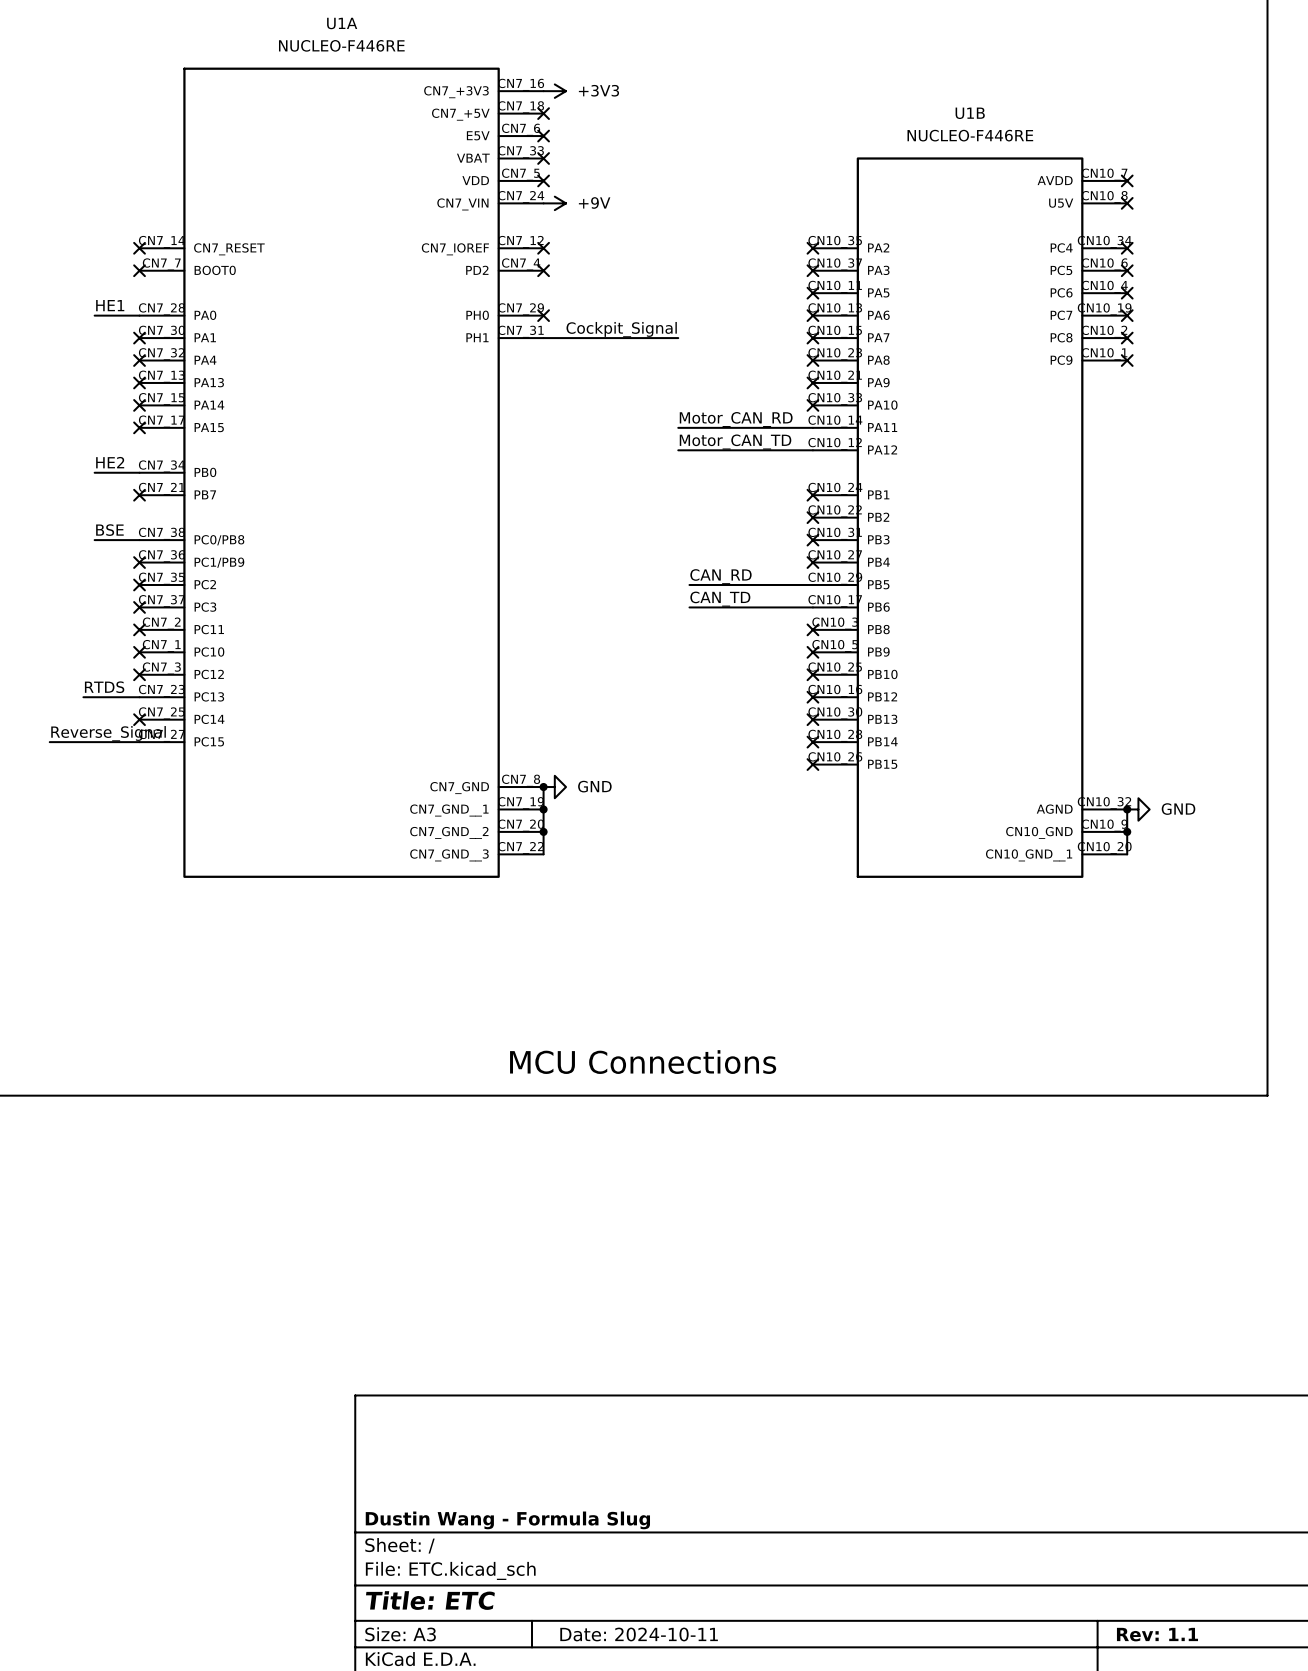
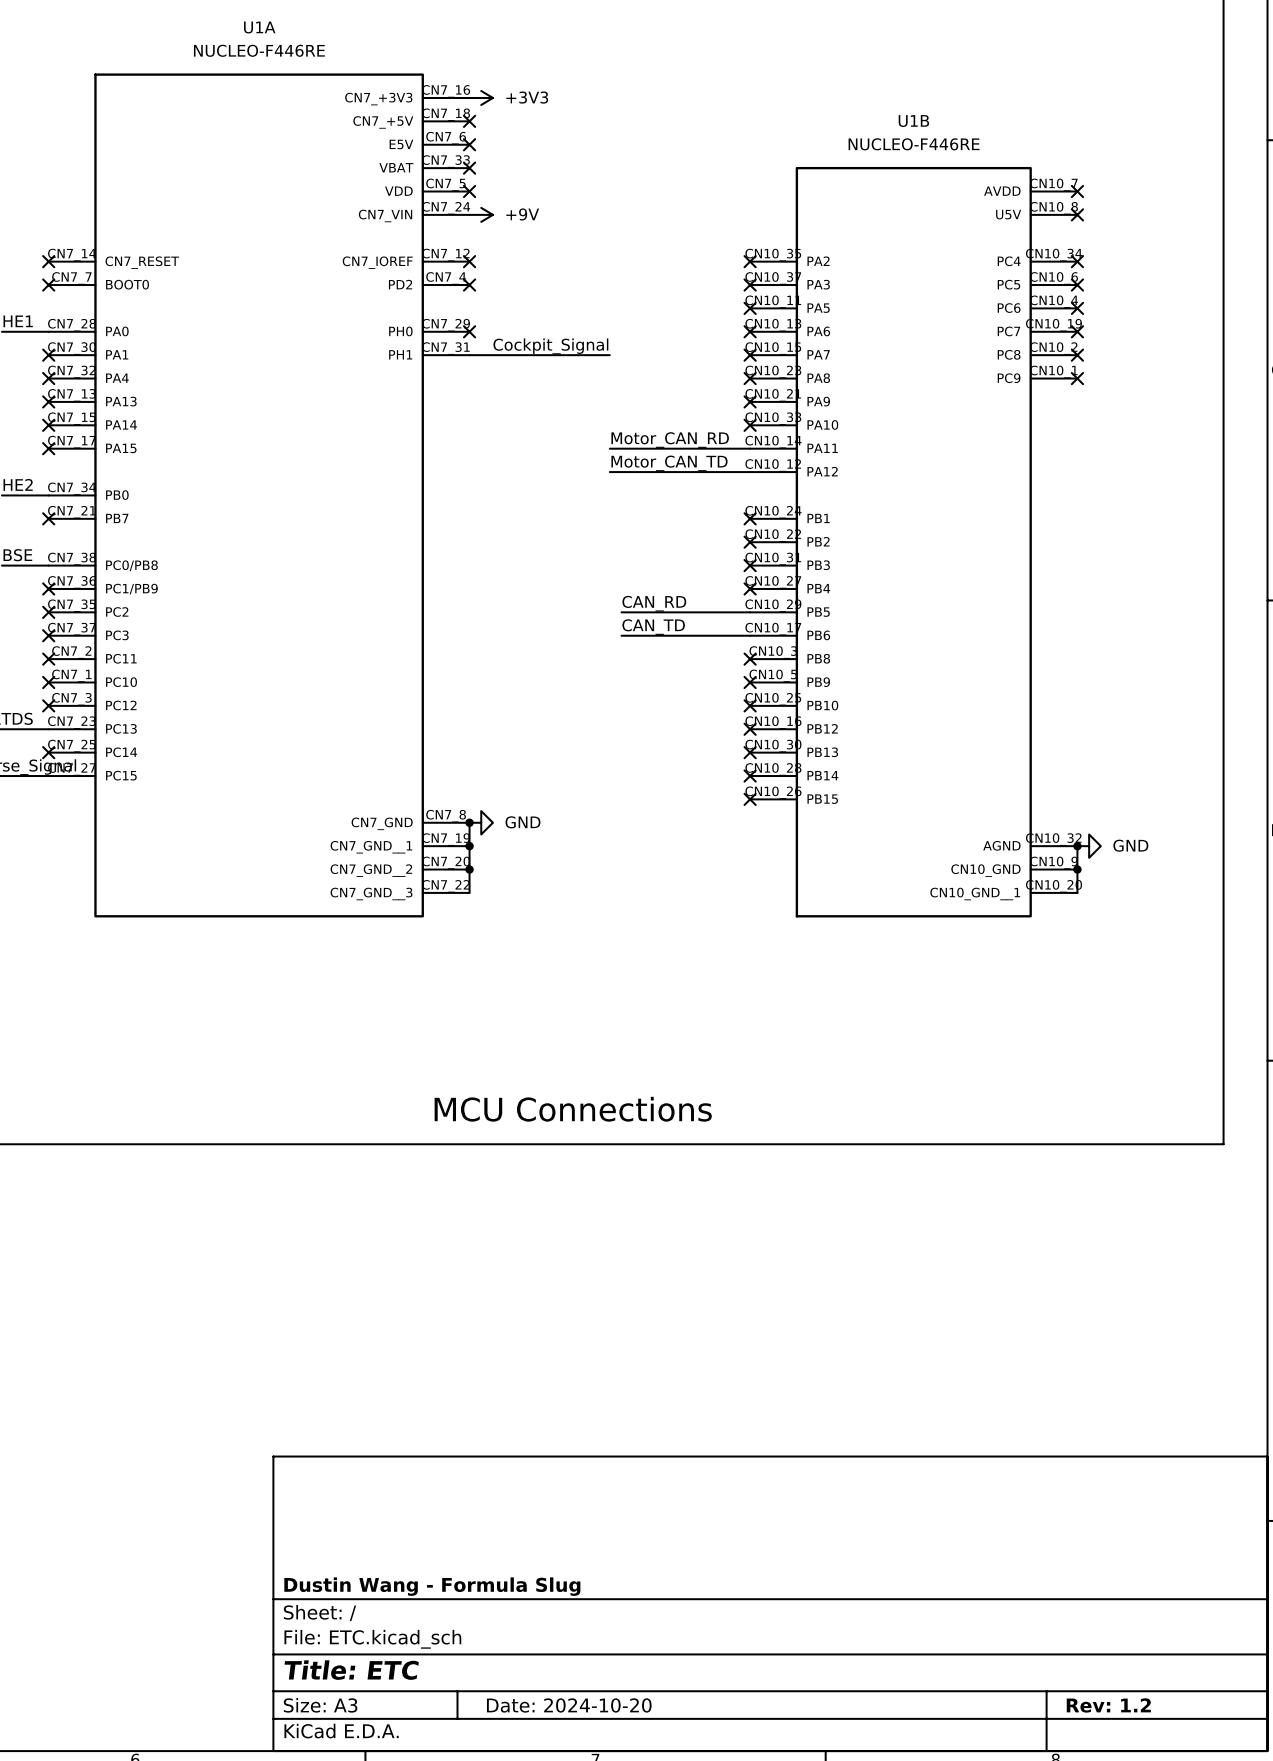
title block: Date: 2024-10-11 (639, 1634) -> Date: 2024-10-20 (569, 1705)
title block: Rev: 1.1 (1157, 1634) -> Rev: 1.2 (1108, 1705)

